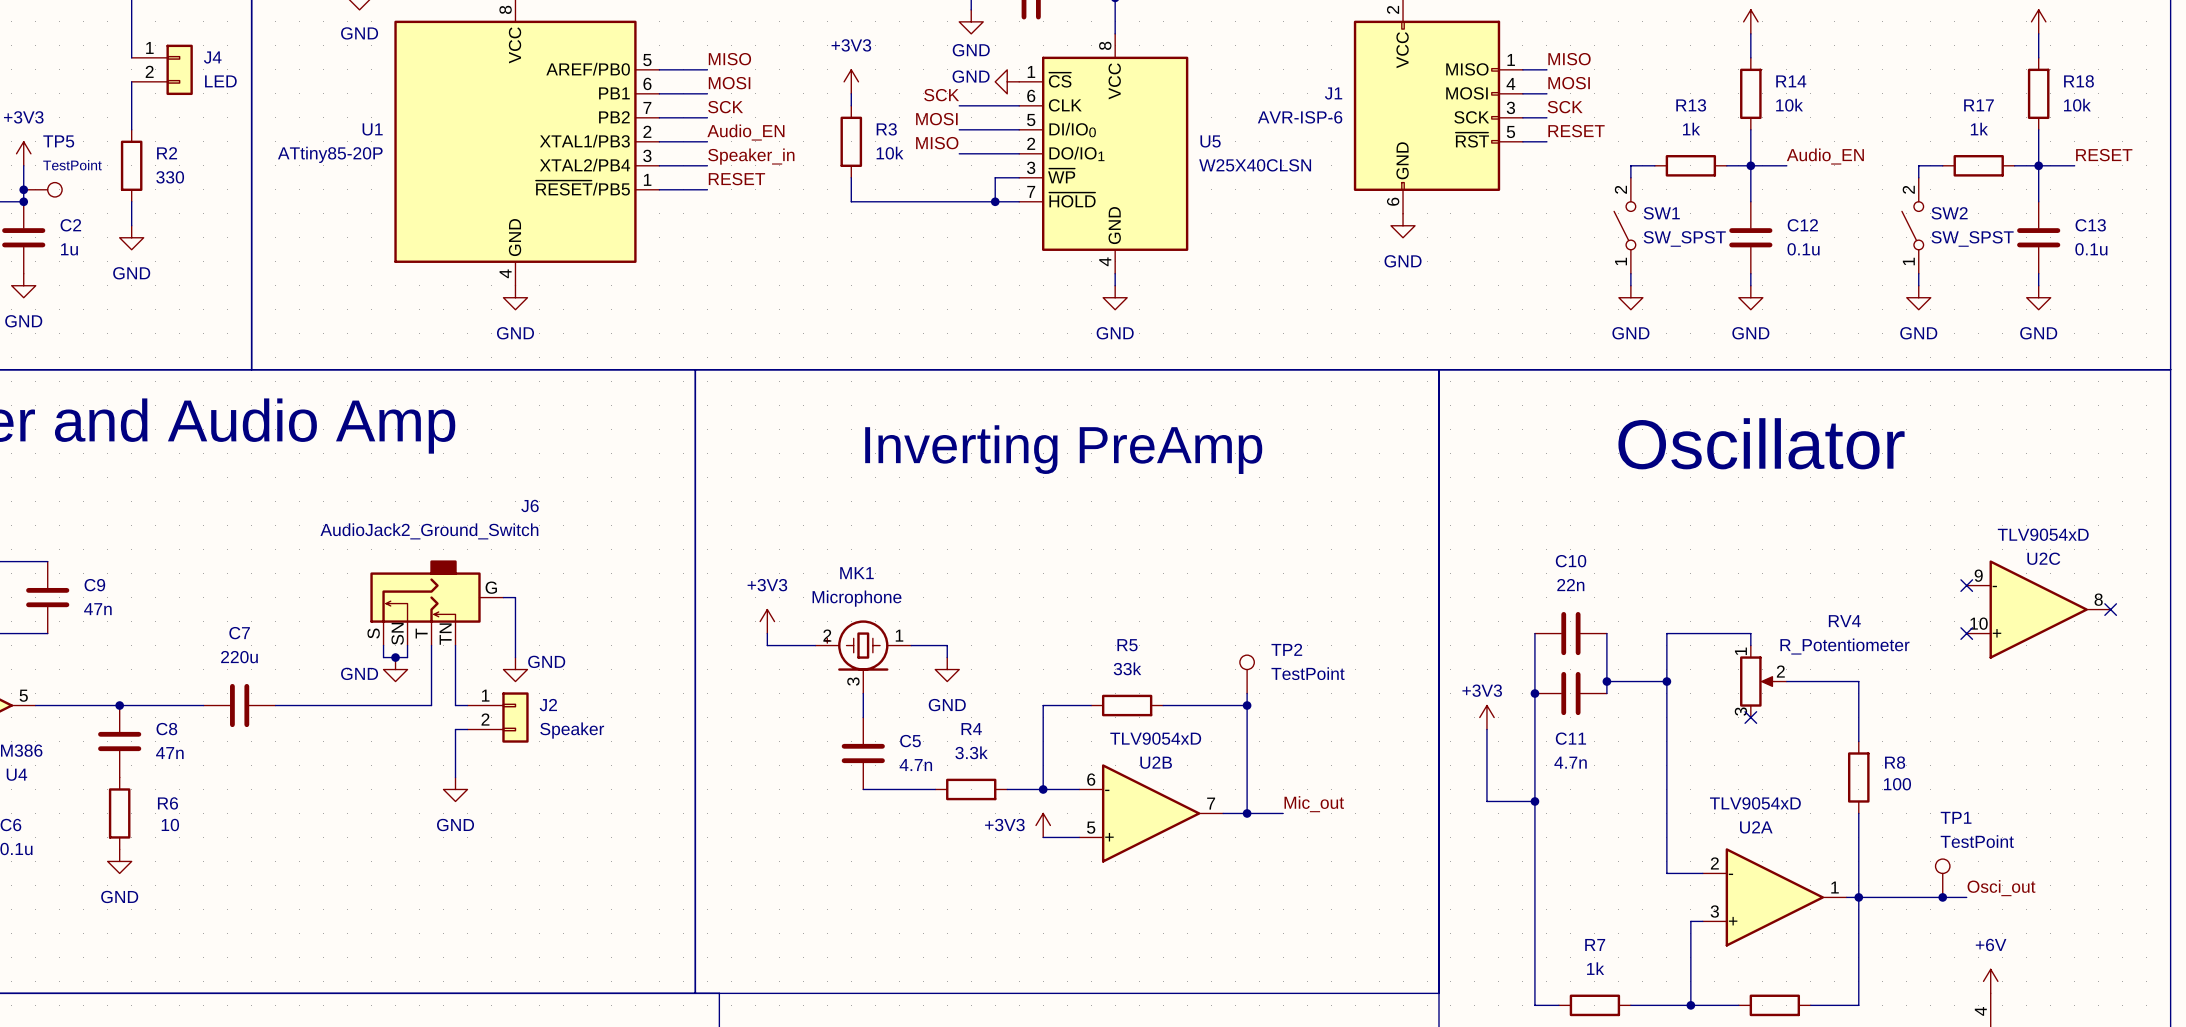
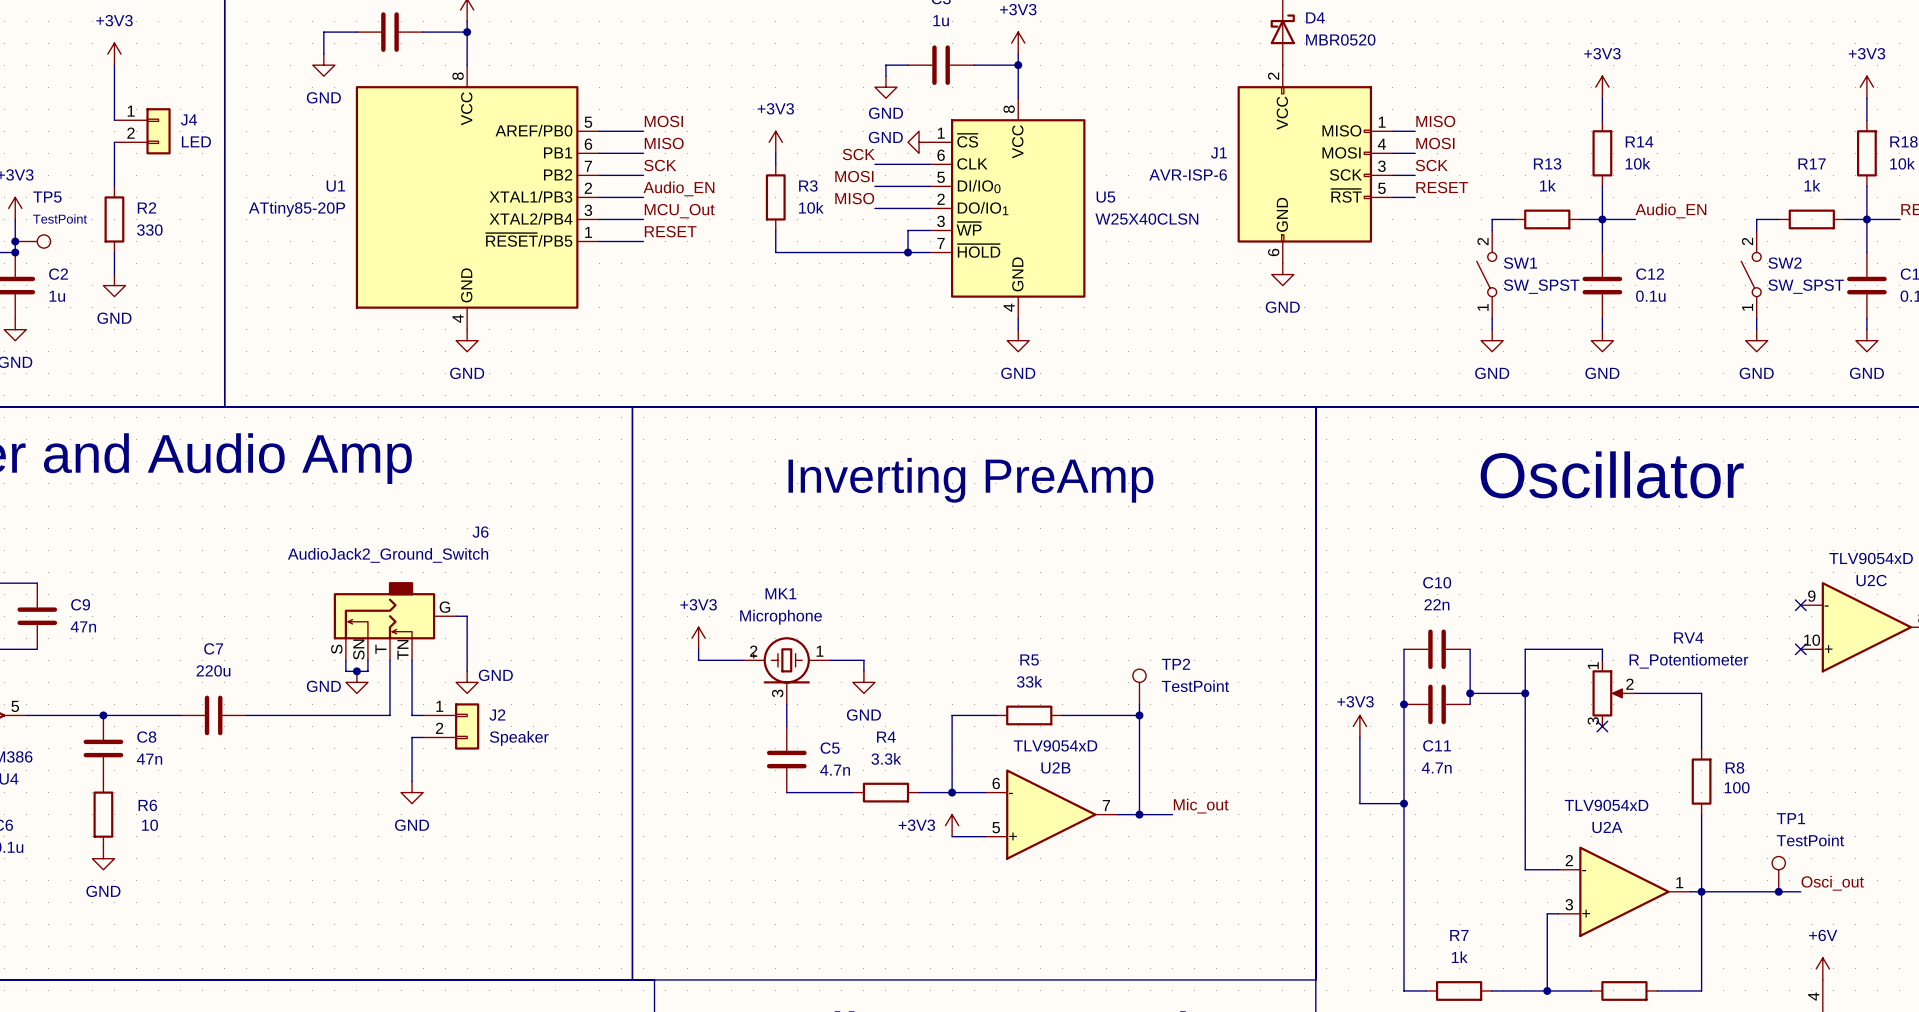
label: MISO (729, 59) -> MOSI (663, 121)
label: MOSI (729, 83) -> MISO (664, 143)
label: Speaker_in (751, 156) -> MCU_Out (679, 211)

